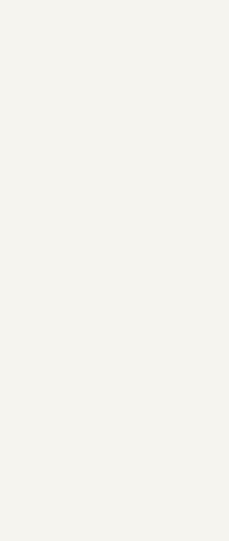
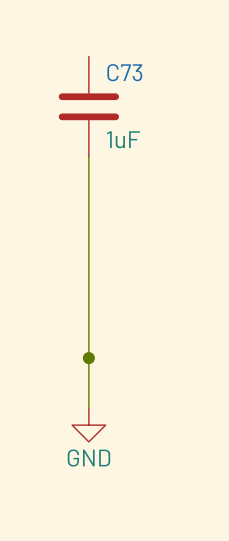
C73: none -> 1uF (88, 106)
wire: none -> (88, 157) (88, 408)
junction: none -> (88, 358)
power symbol: none -> GND (88, 425)

